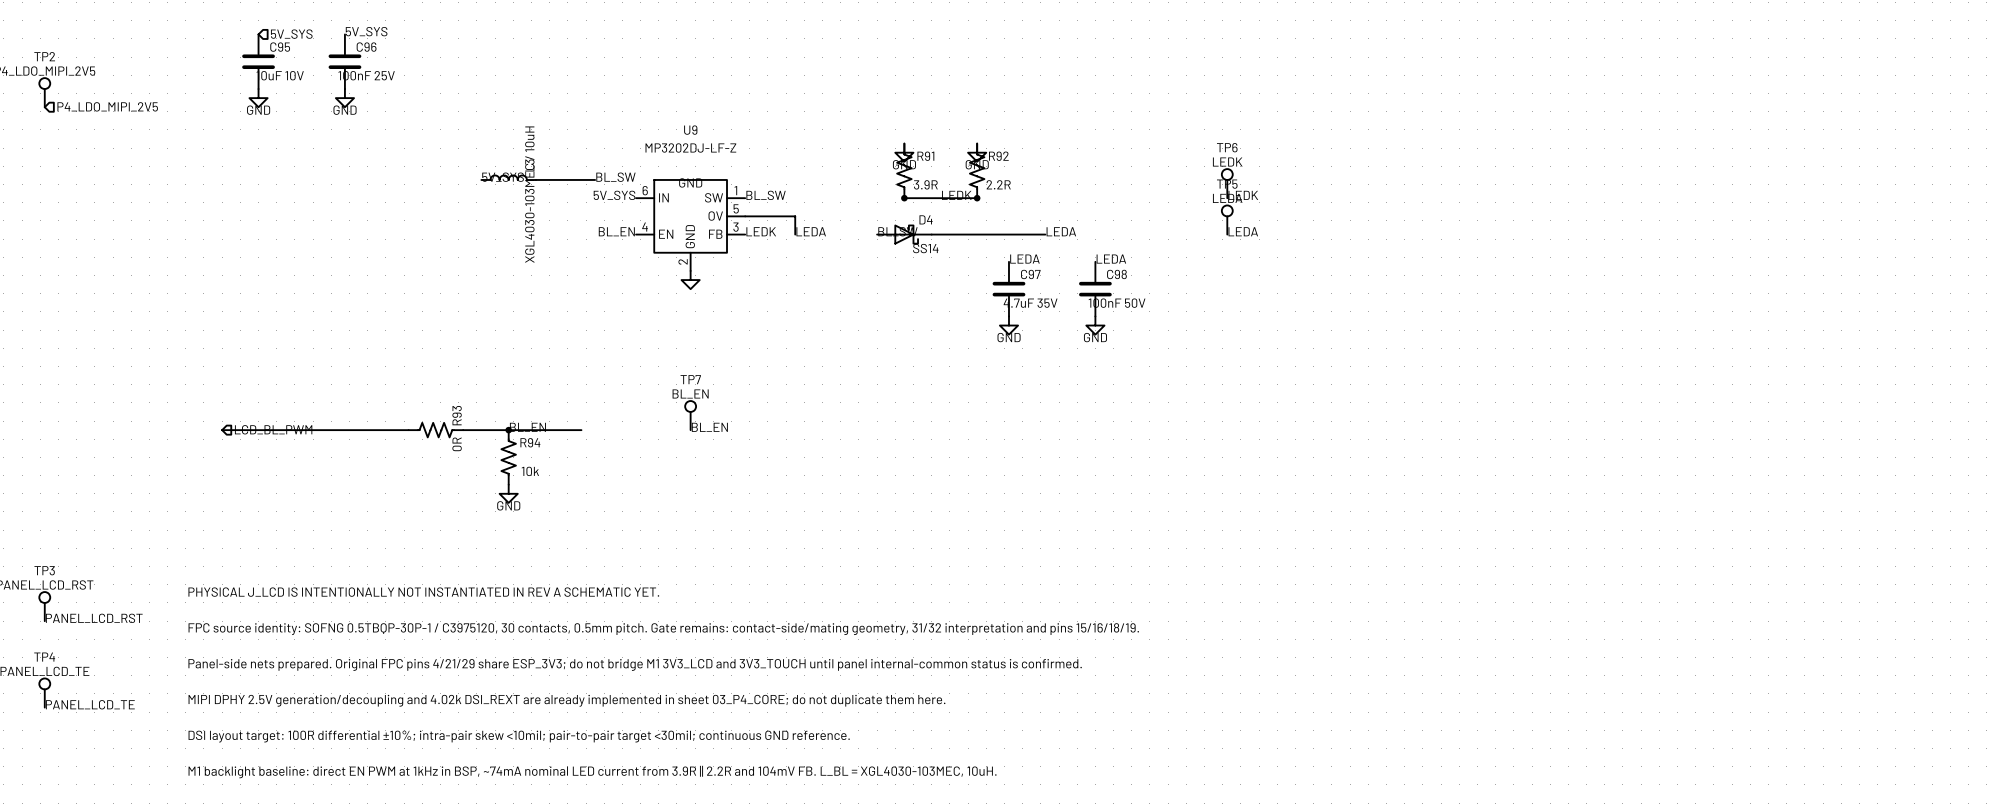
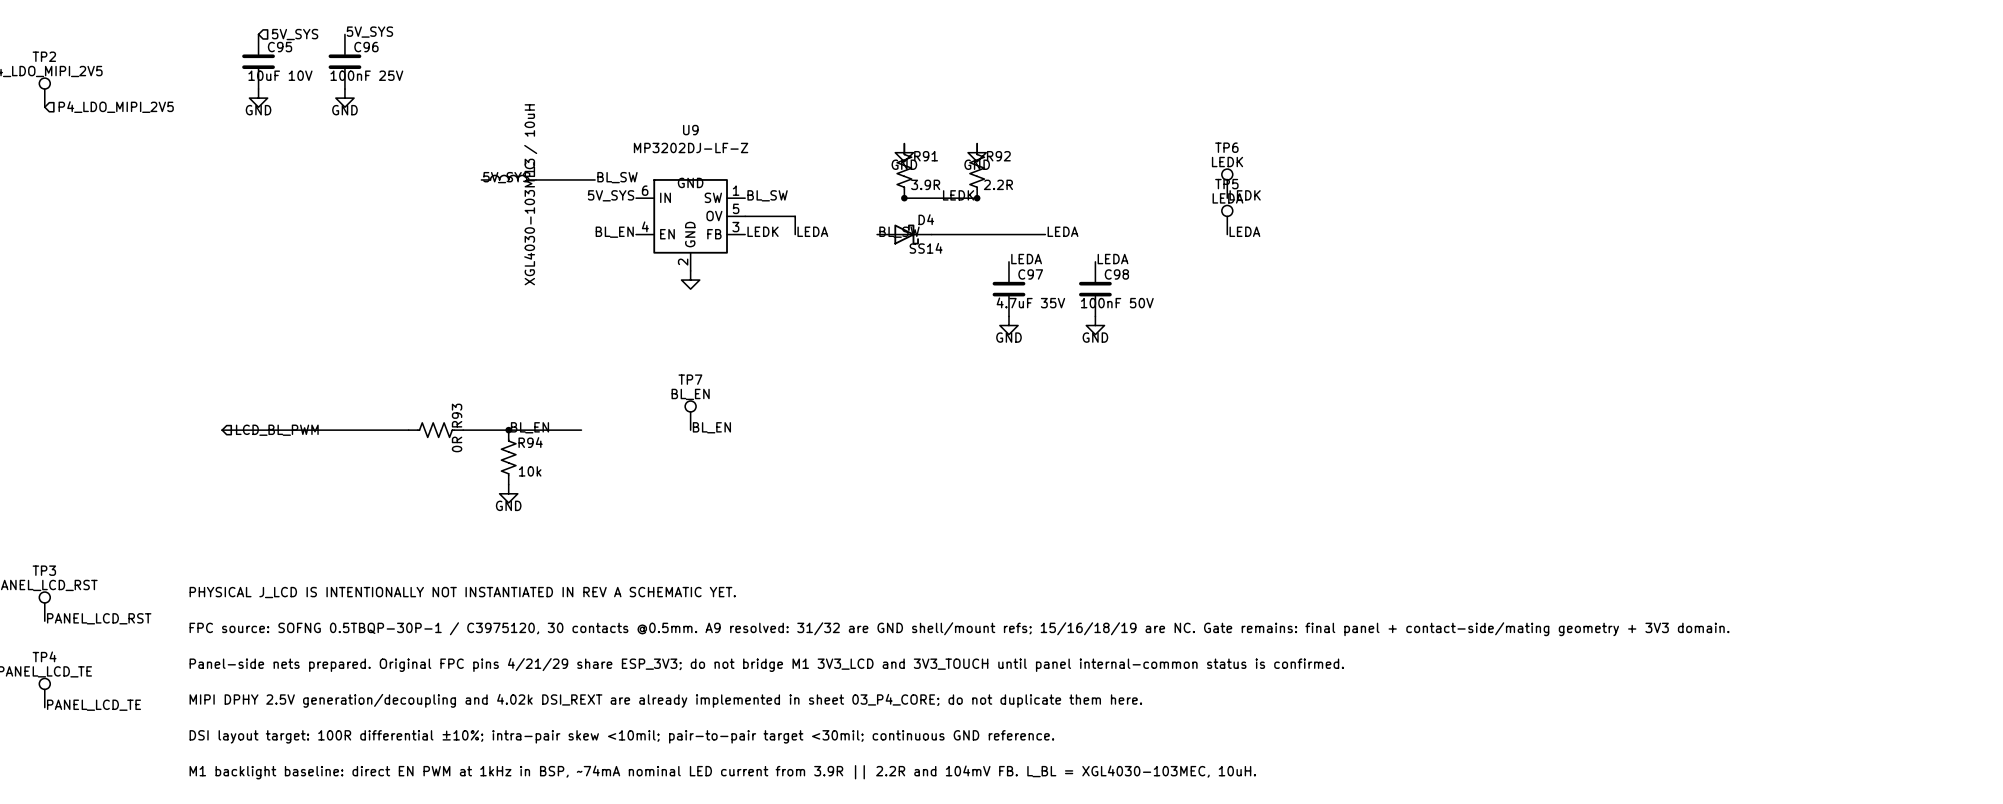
text: FPC source identity: SOFNG 0.5TBQP-30P-1 / C3975120, 30 contacts, 0.5mm pitch. Gate remains: contact-side/mating geometry, 31/32 interpretation and pins 15/16/18/19. (663, 629) -> FPC source: SOFNG 0.5TBQP-30P-1 / C3975120, 30 contacts @0.5mm. A9 resolved: 31/32 are GND shell/mount refs; 15/16/18/19 are NC. Gate remains: final panel + contact-side/mating geometry + 3V3 domain. (959, 629)

